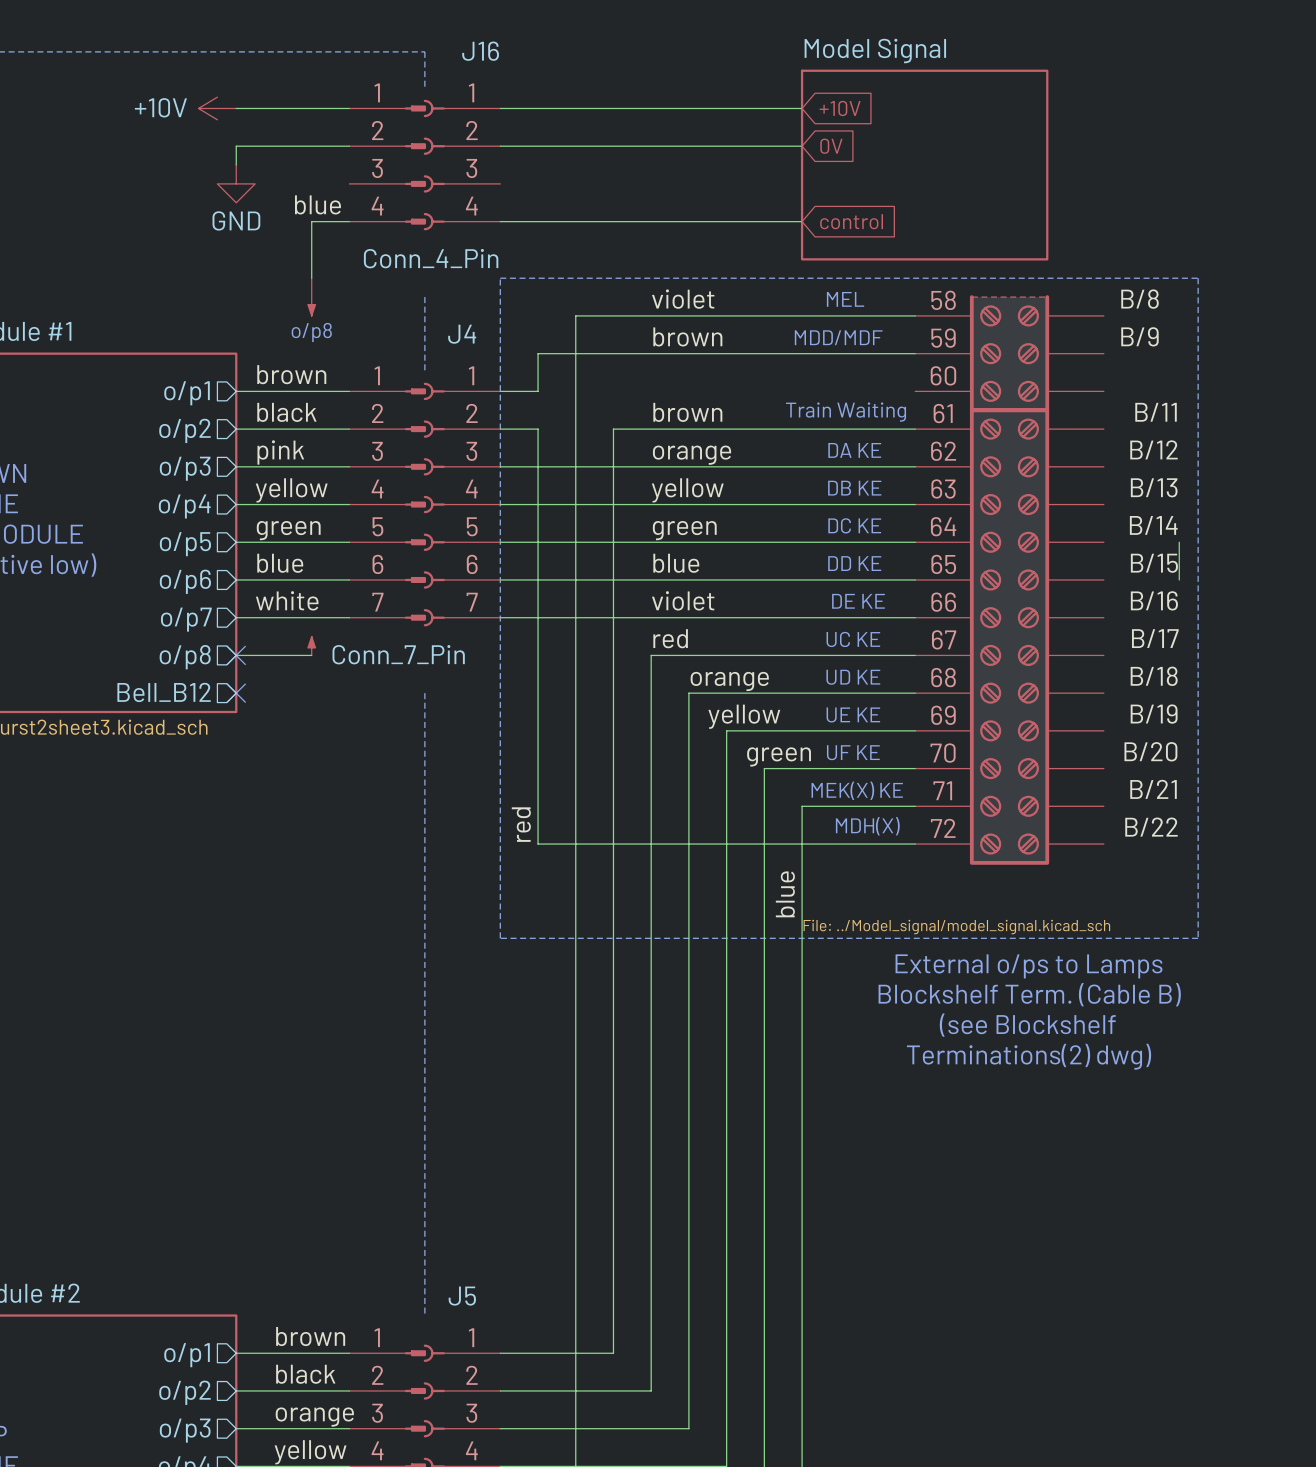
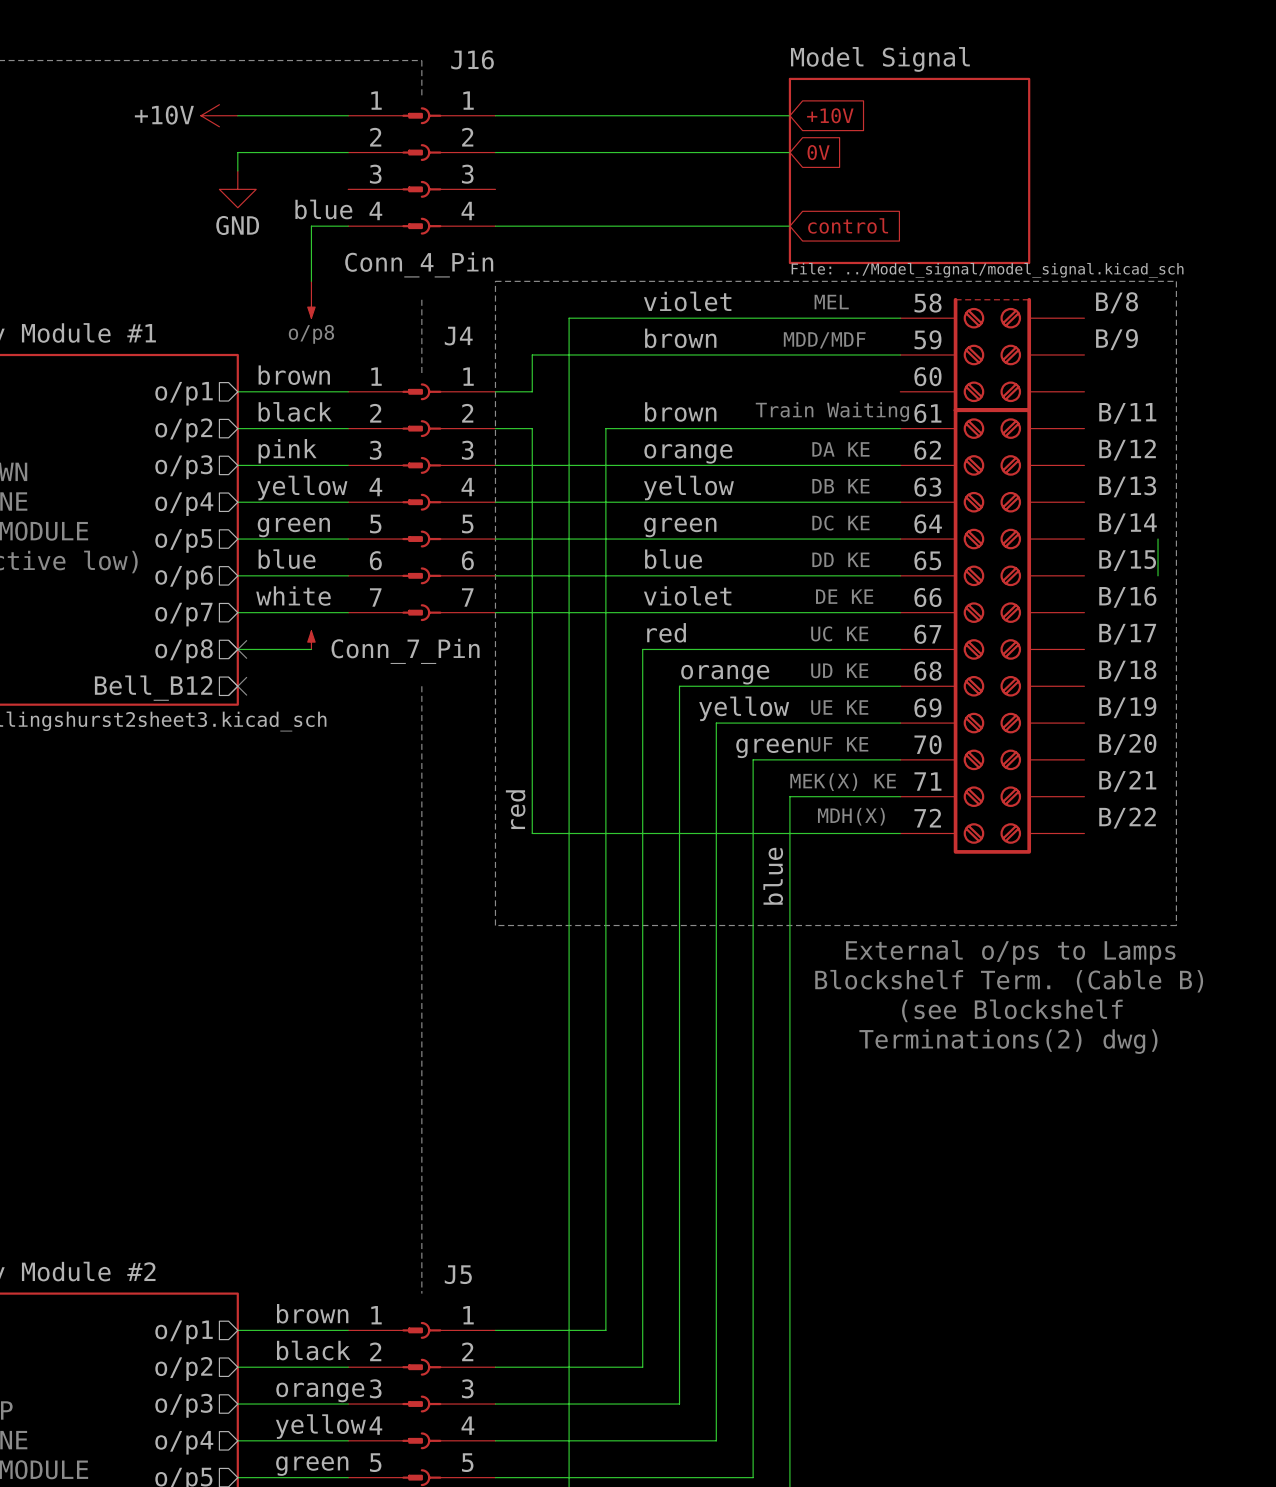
sheet Model Signal value position: File: ../Model_signal/model_signal.kicad_sch (956, 927) -> File: ../Model_signal/model_signal.kicad_sch (987, 270)

